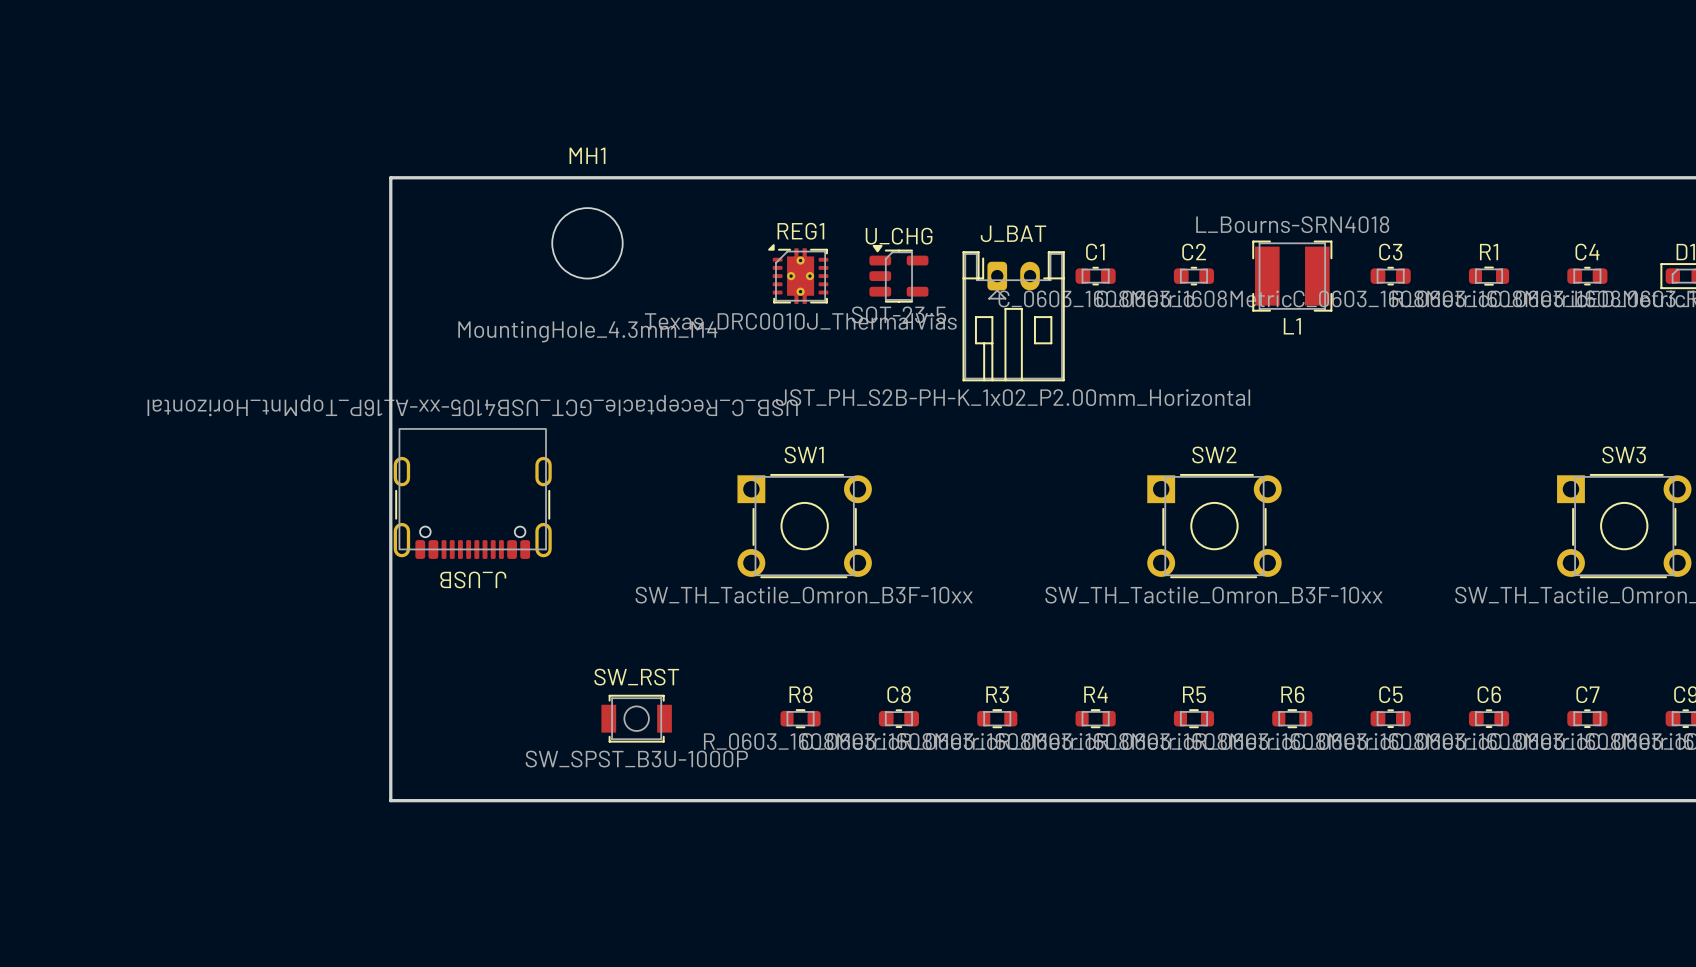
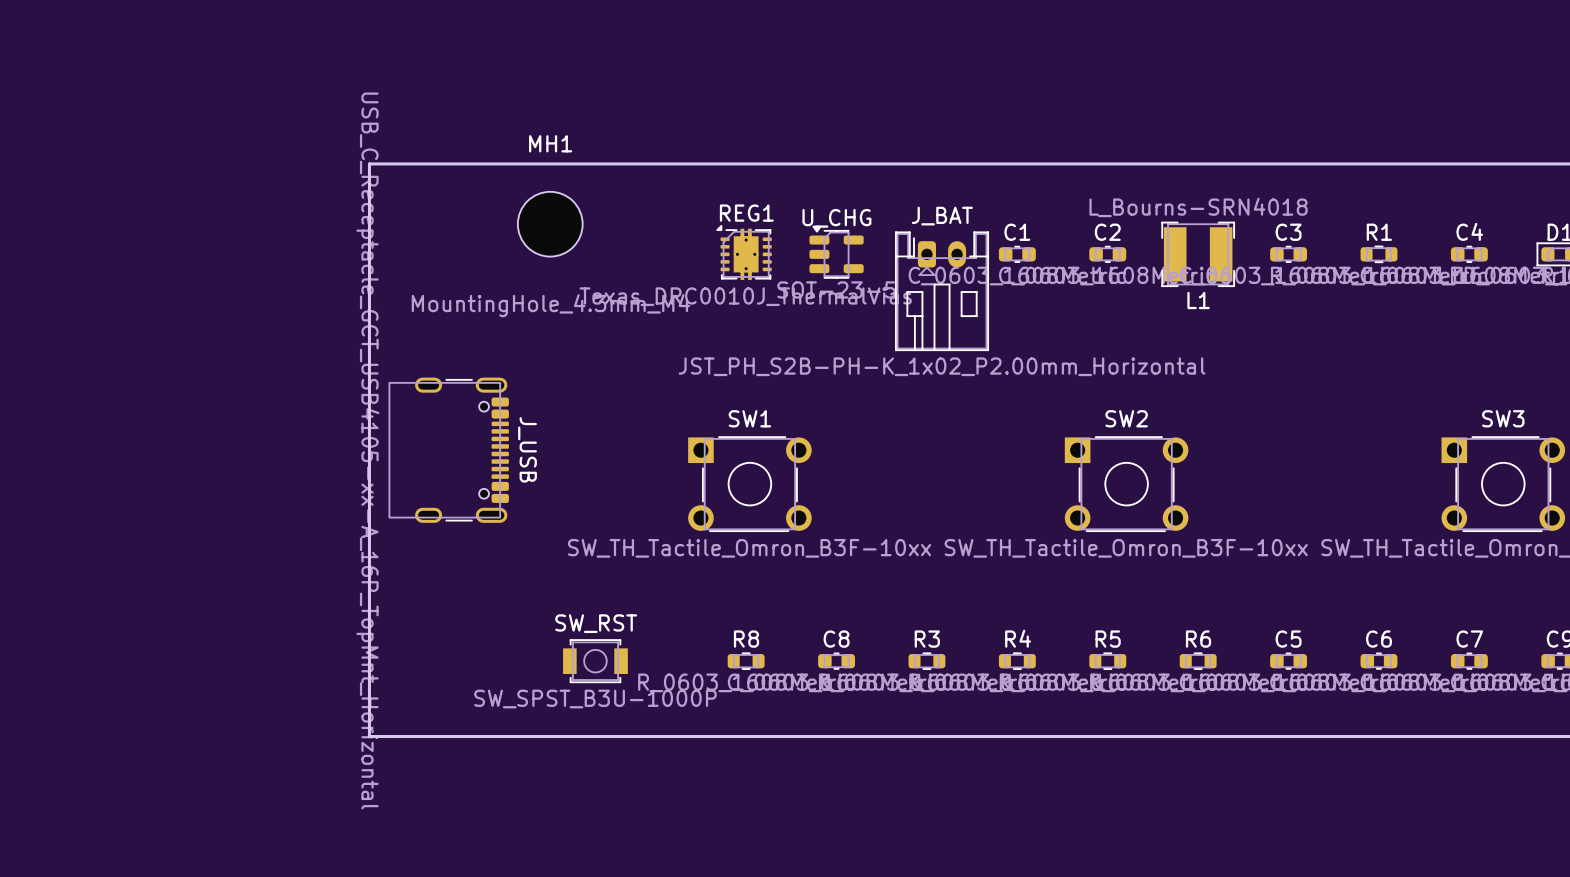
J_USB rotation: 0° (472, 493) -> 90° counterclockwise (448, 450)

